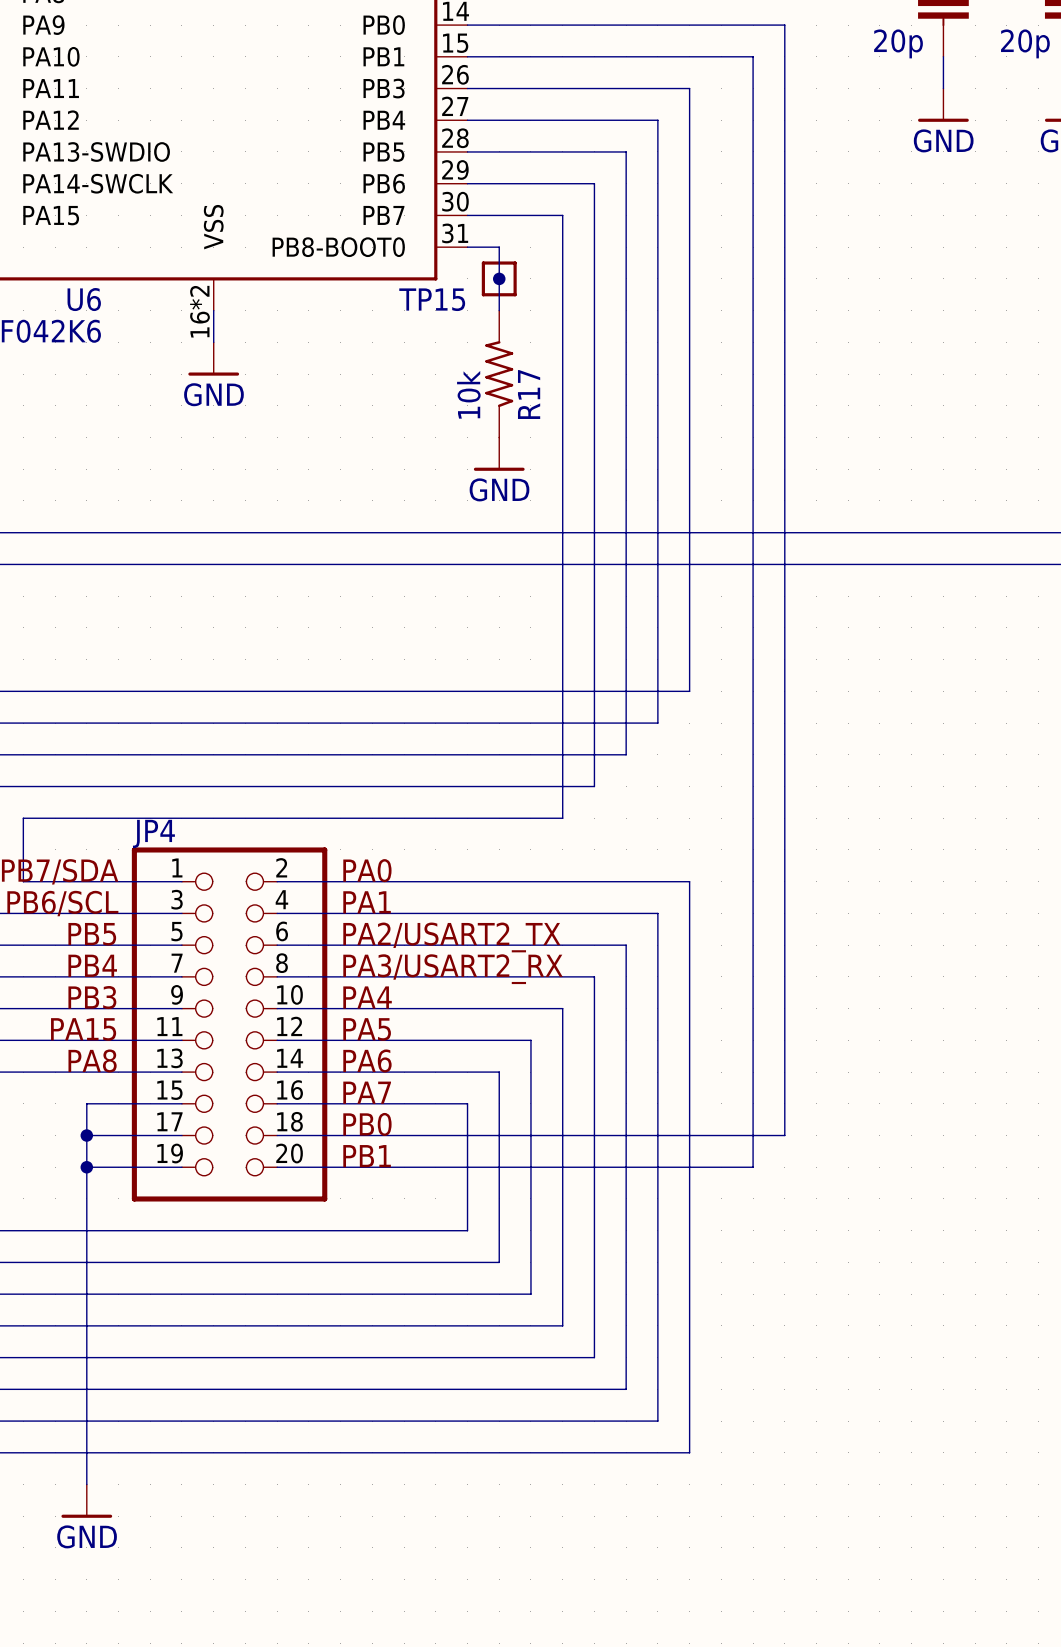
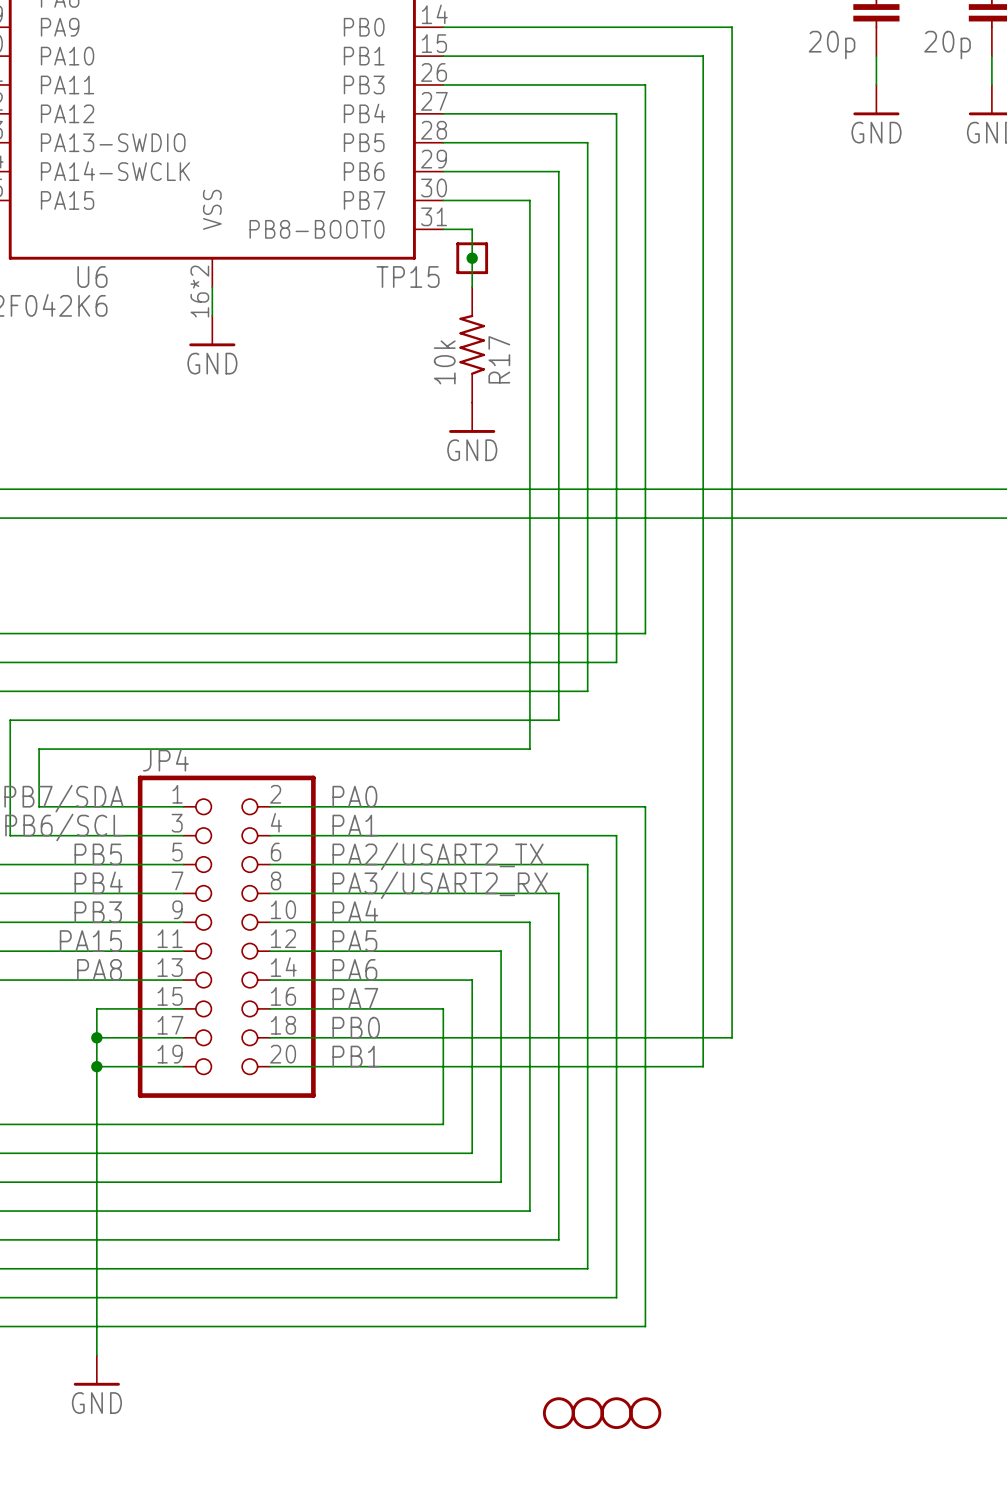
part: none -> (558, 1413)
part: none -> (587, 1413)
part: none -> (616, 1413)
part: none -> (645, 1413)

